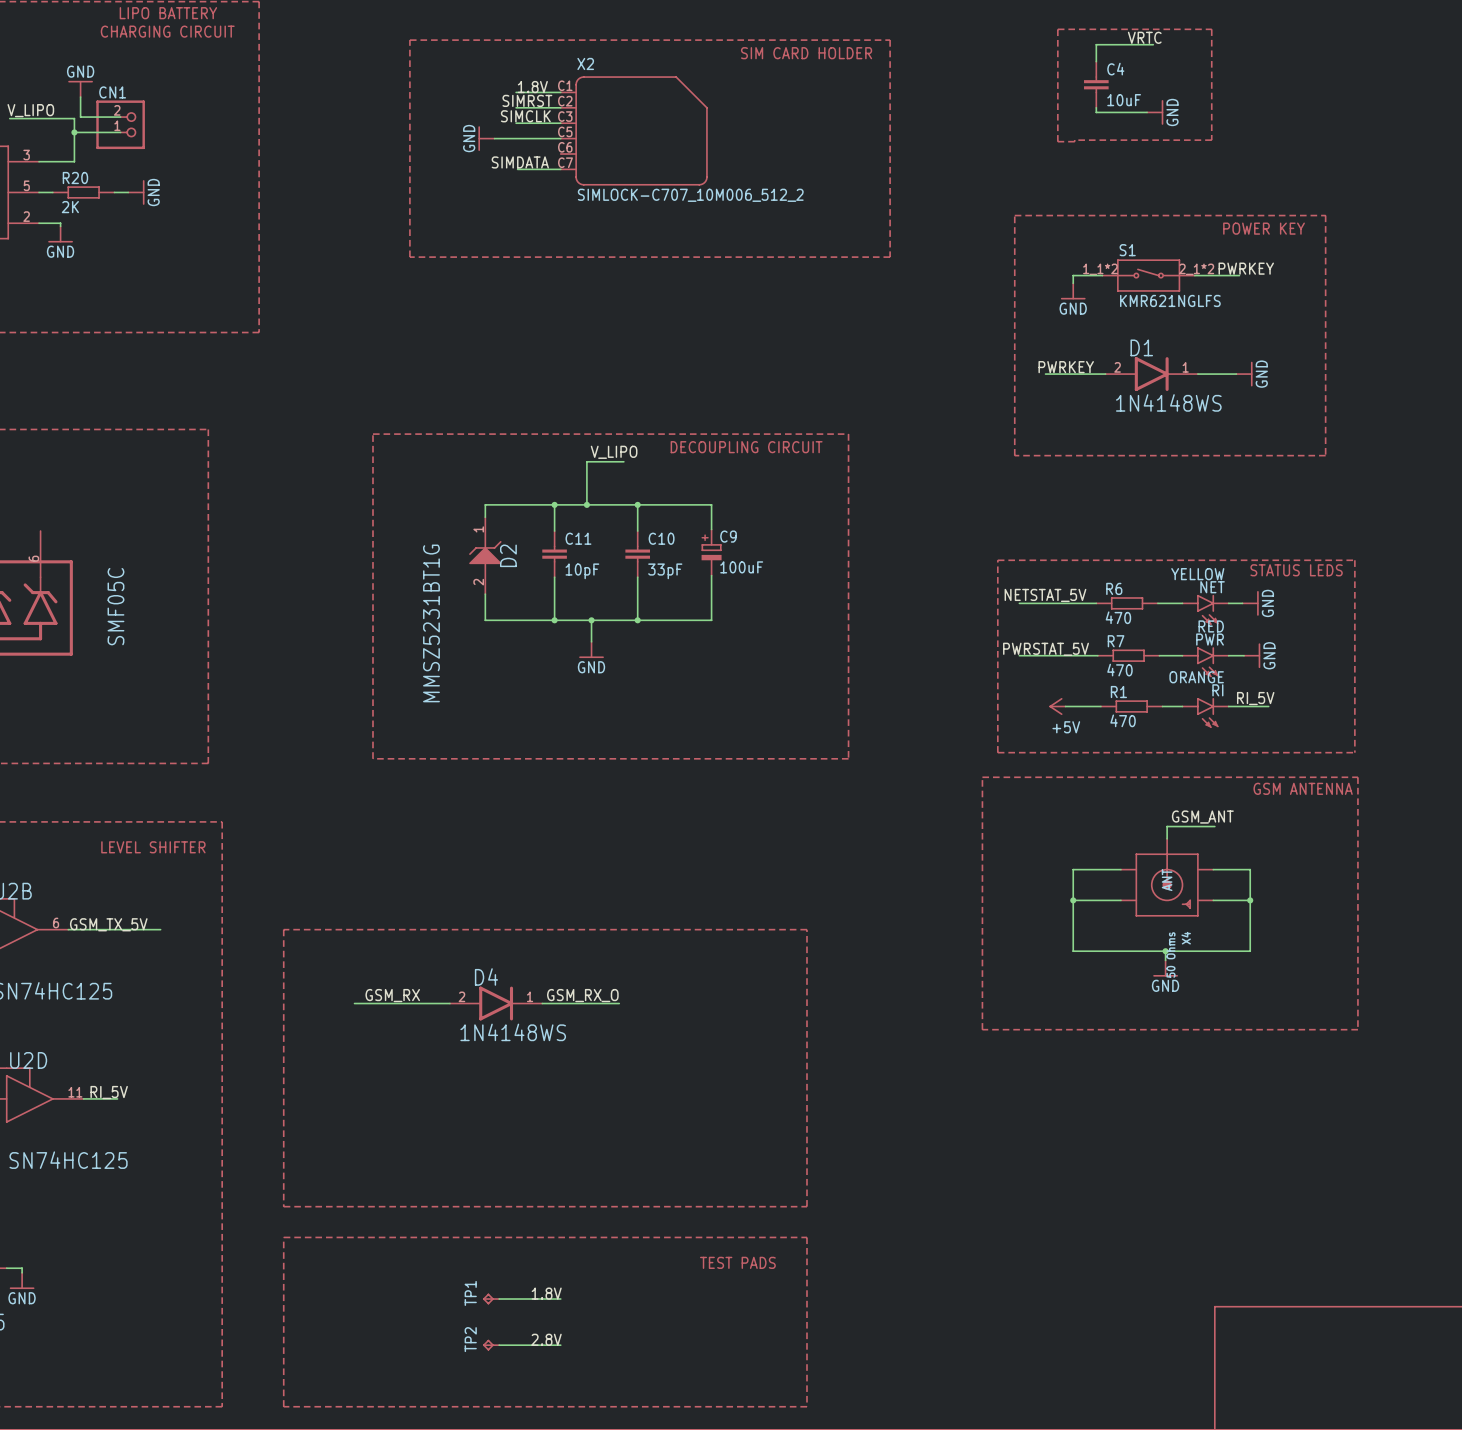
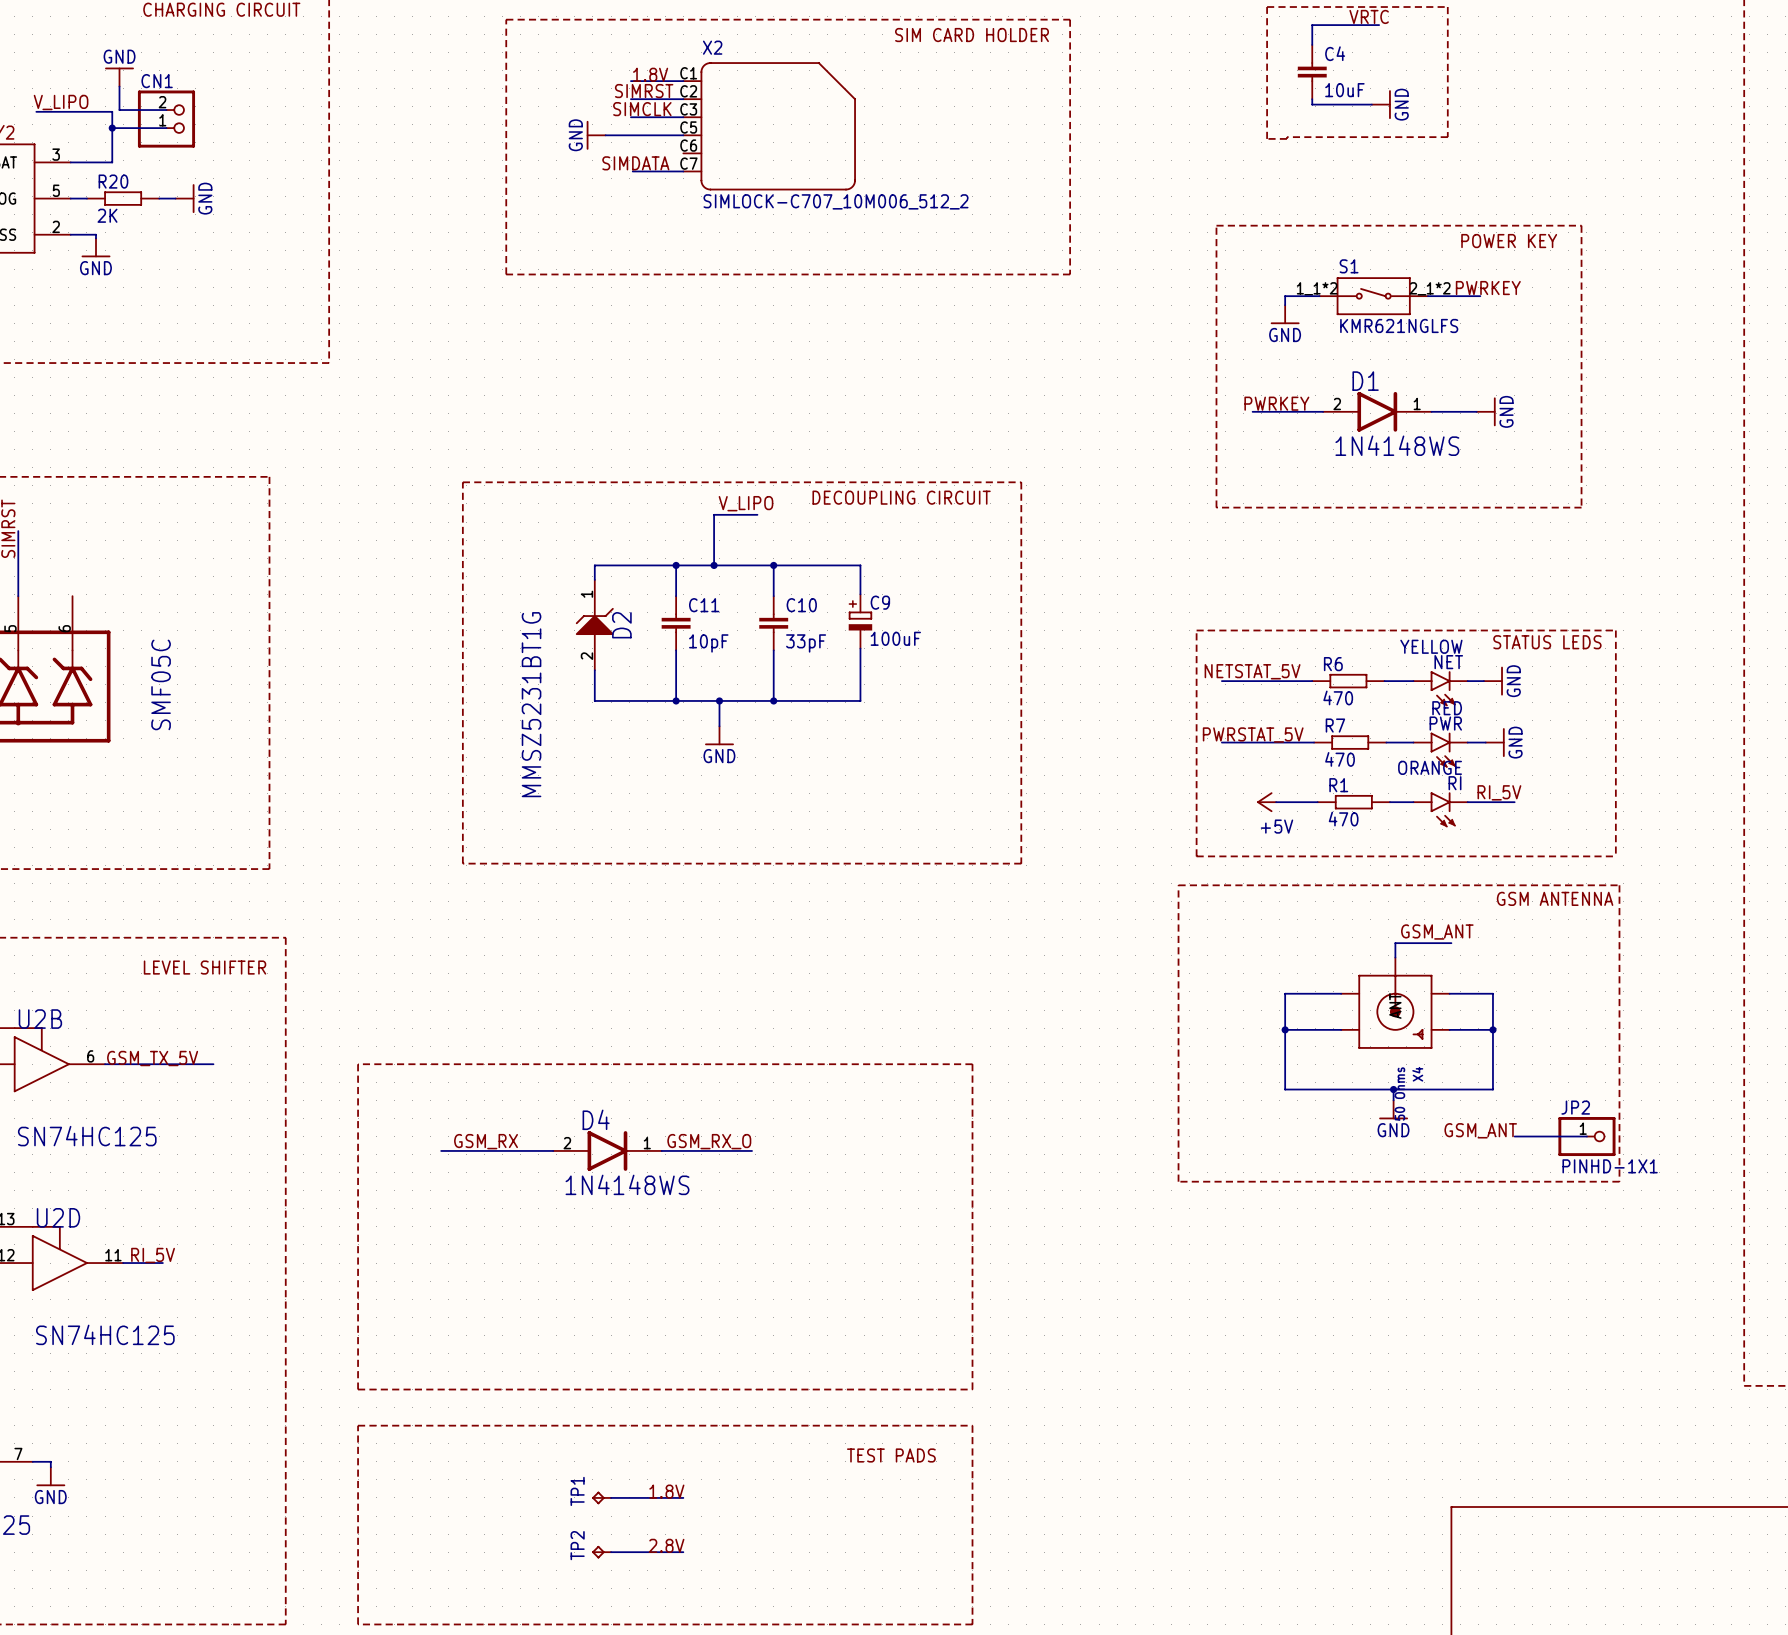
label: none -> GSM_ANT (1480, 1130)
wire: none -> (1514, 1136) (1586, 1136)
JP2: none -> PINHD-1X1 (1586, 1136)

